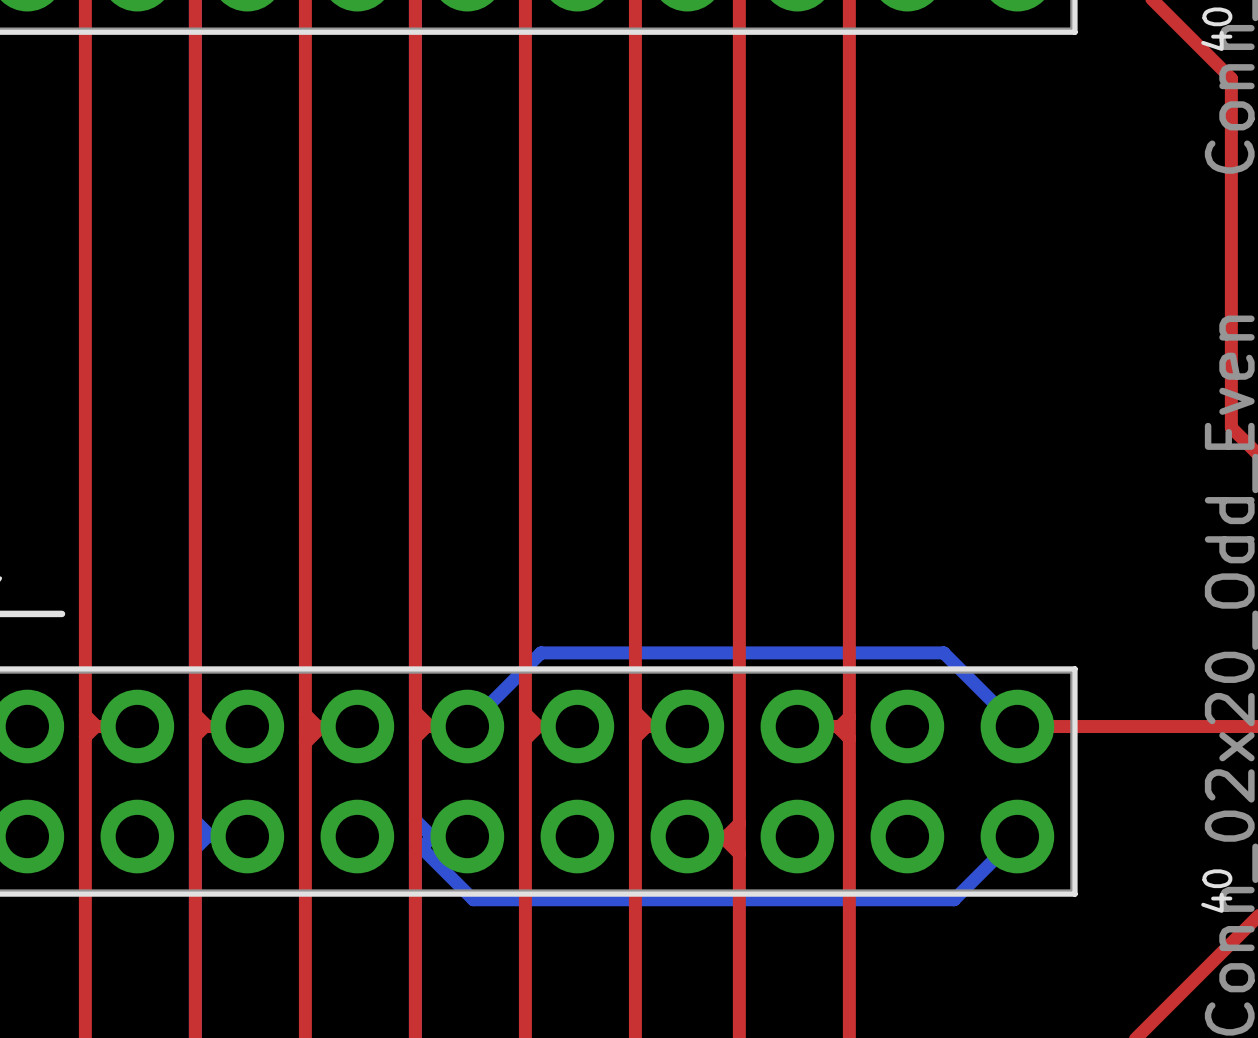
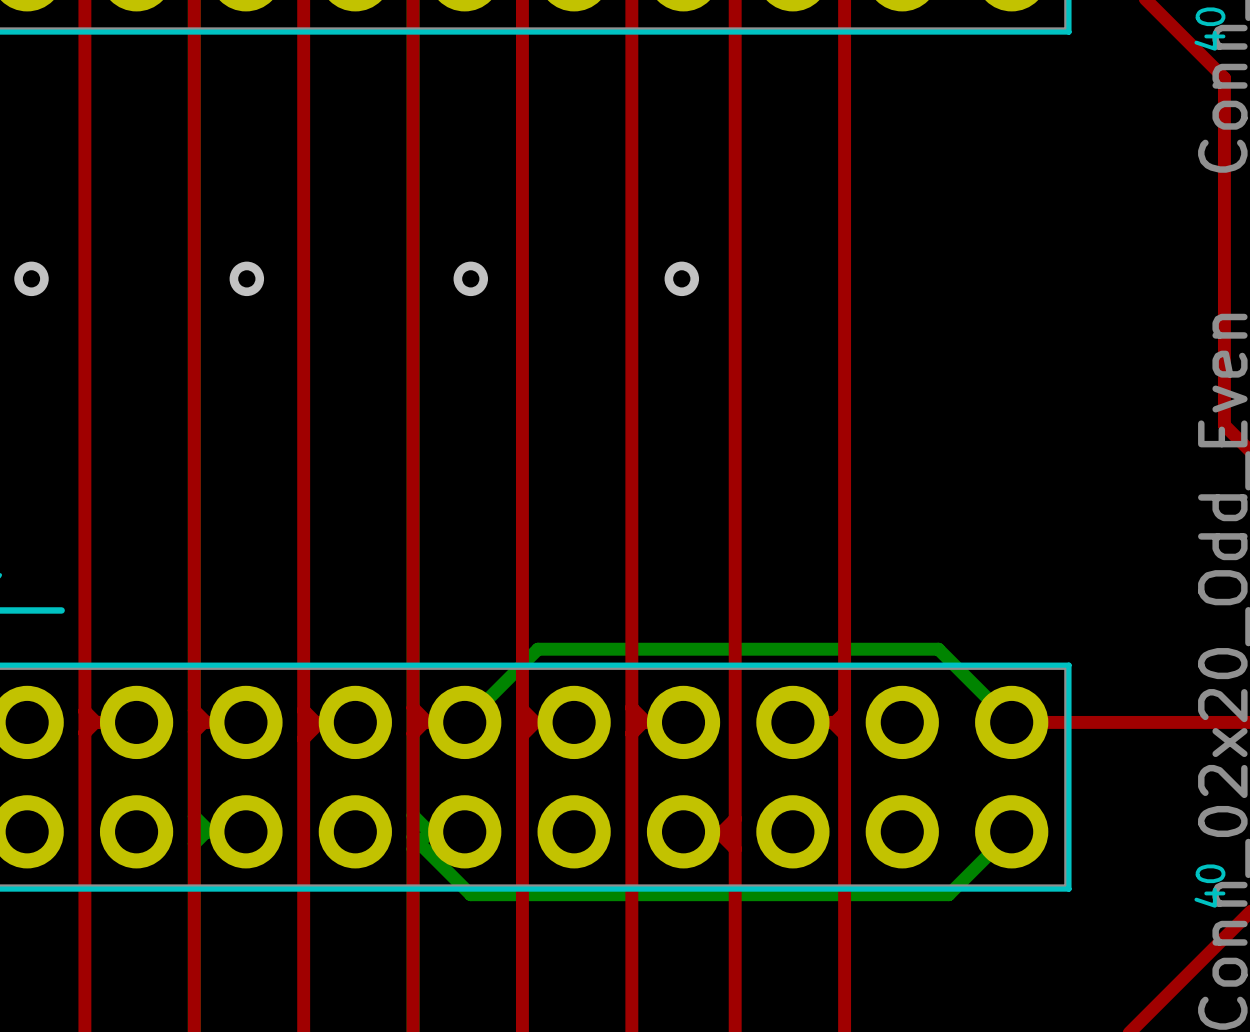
via: none -> (31, 278)
via: none -> (246, 278)
via: none -> (470, 278)
via: none -> (681, 278)

